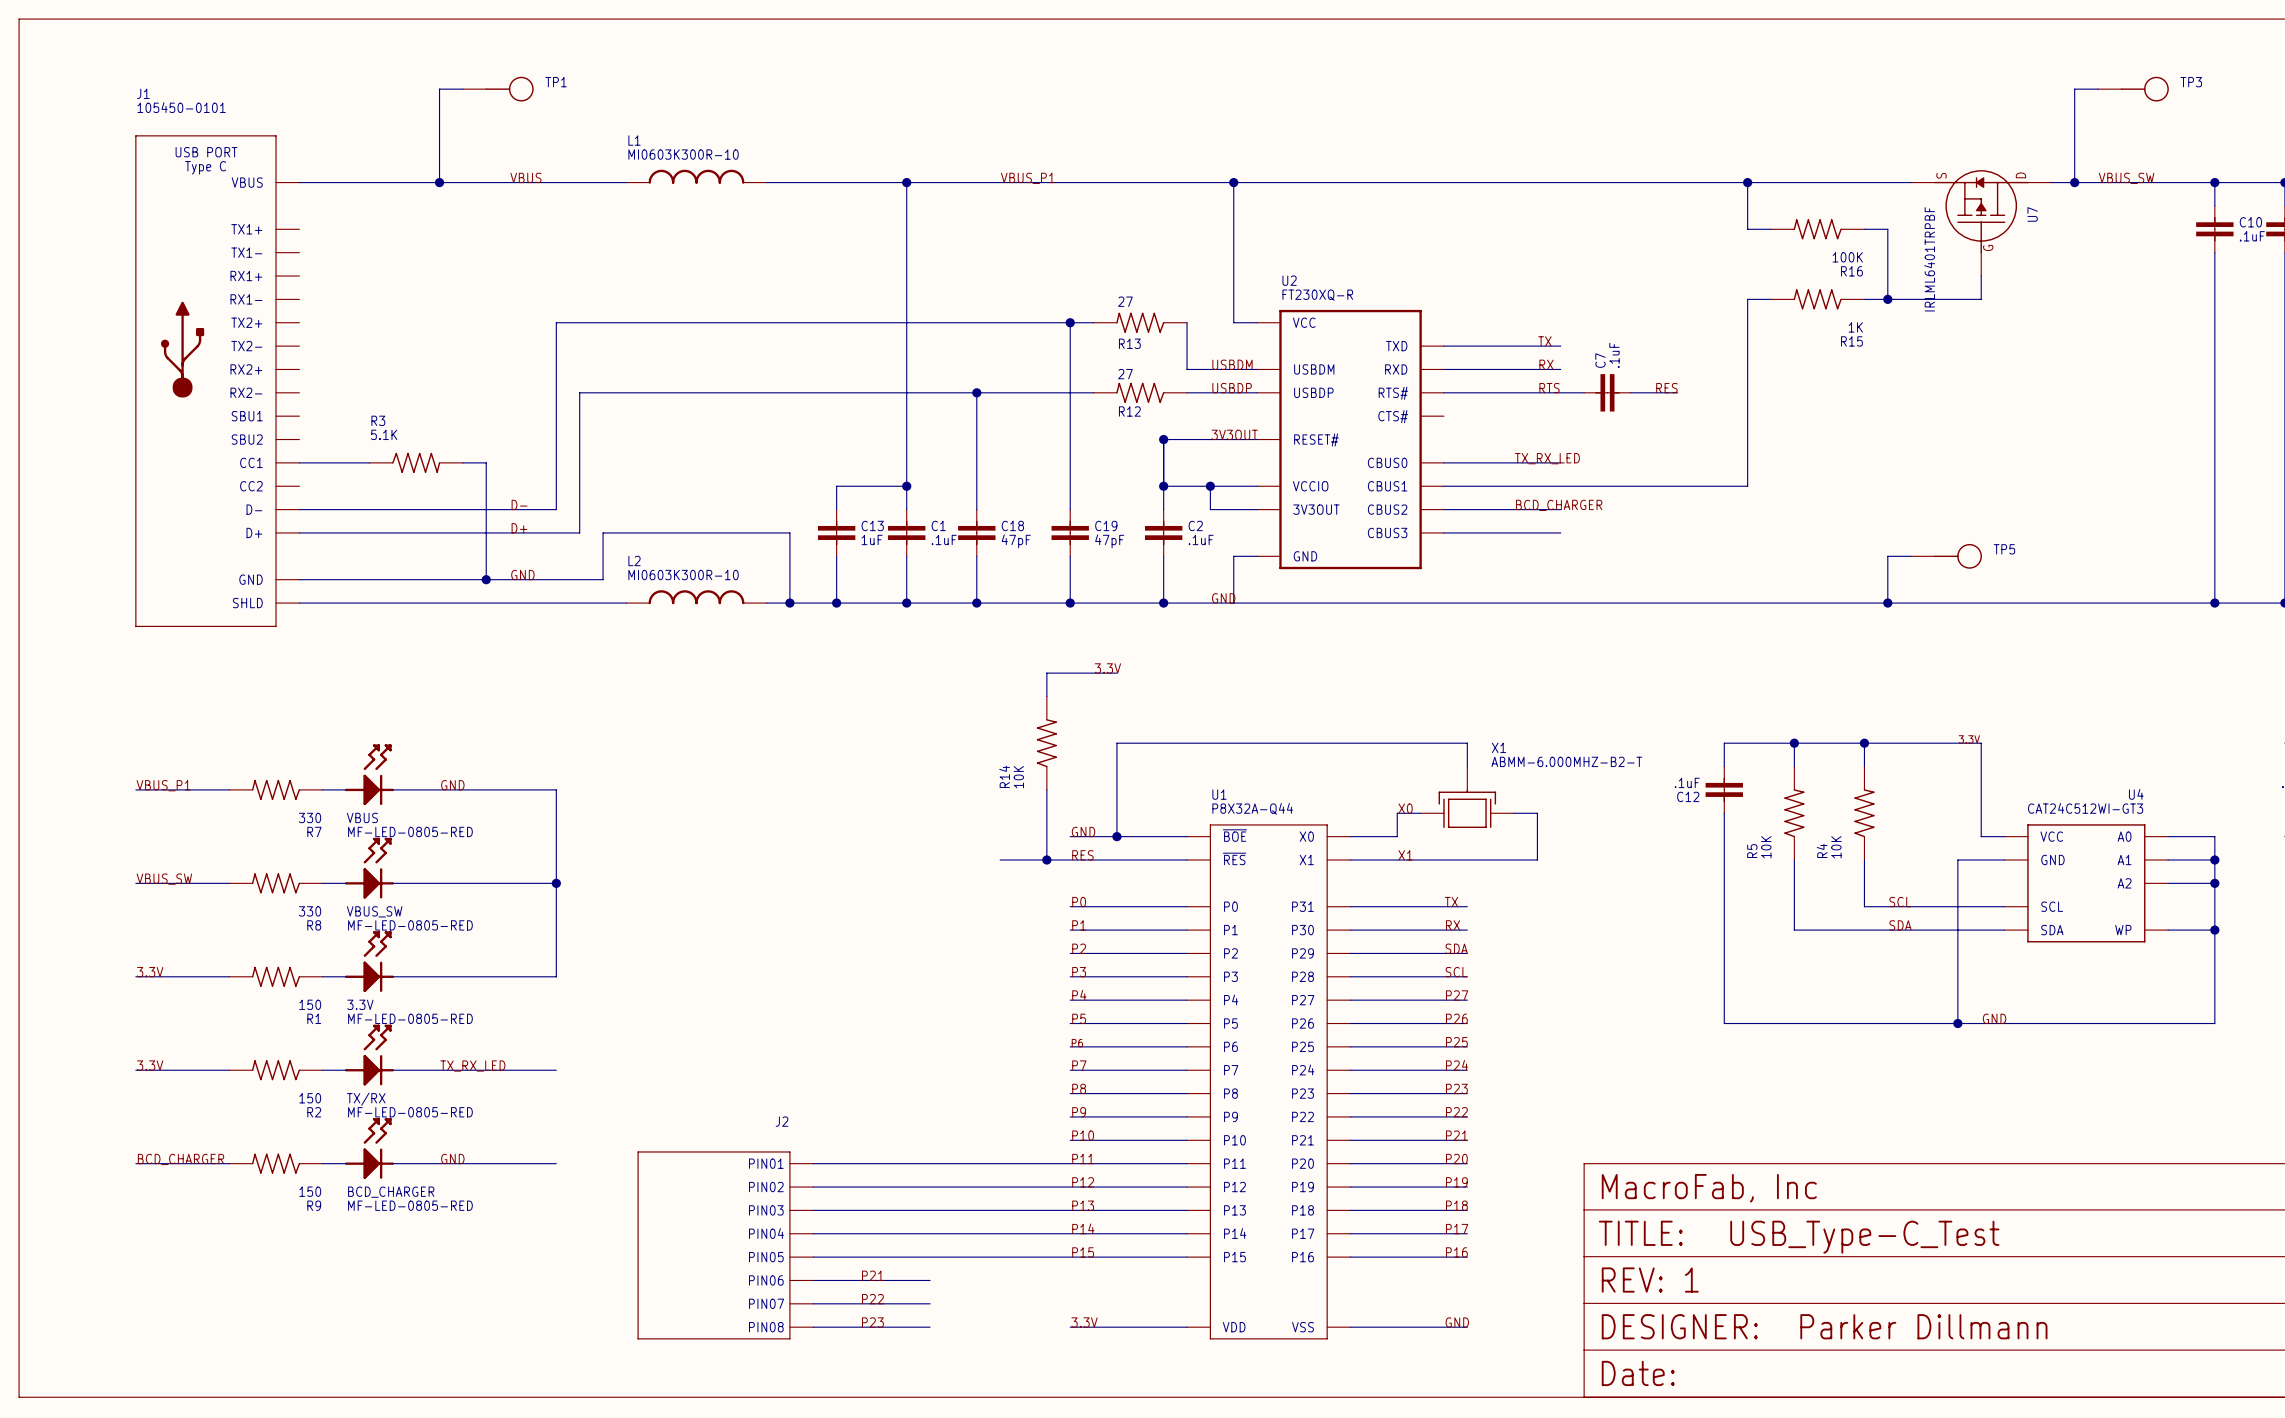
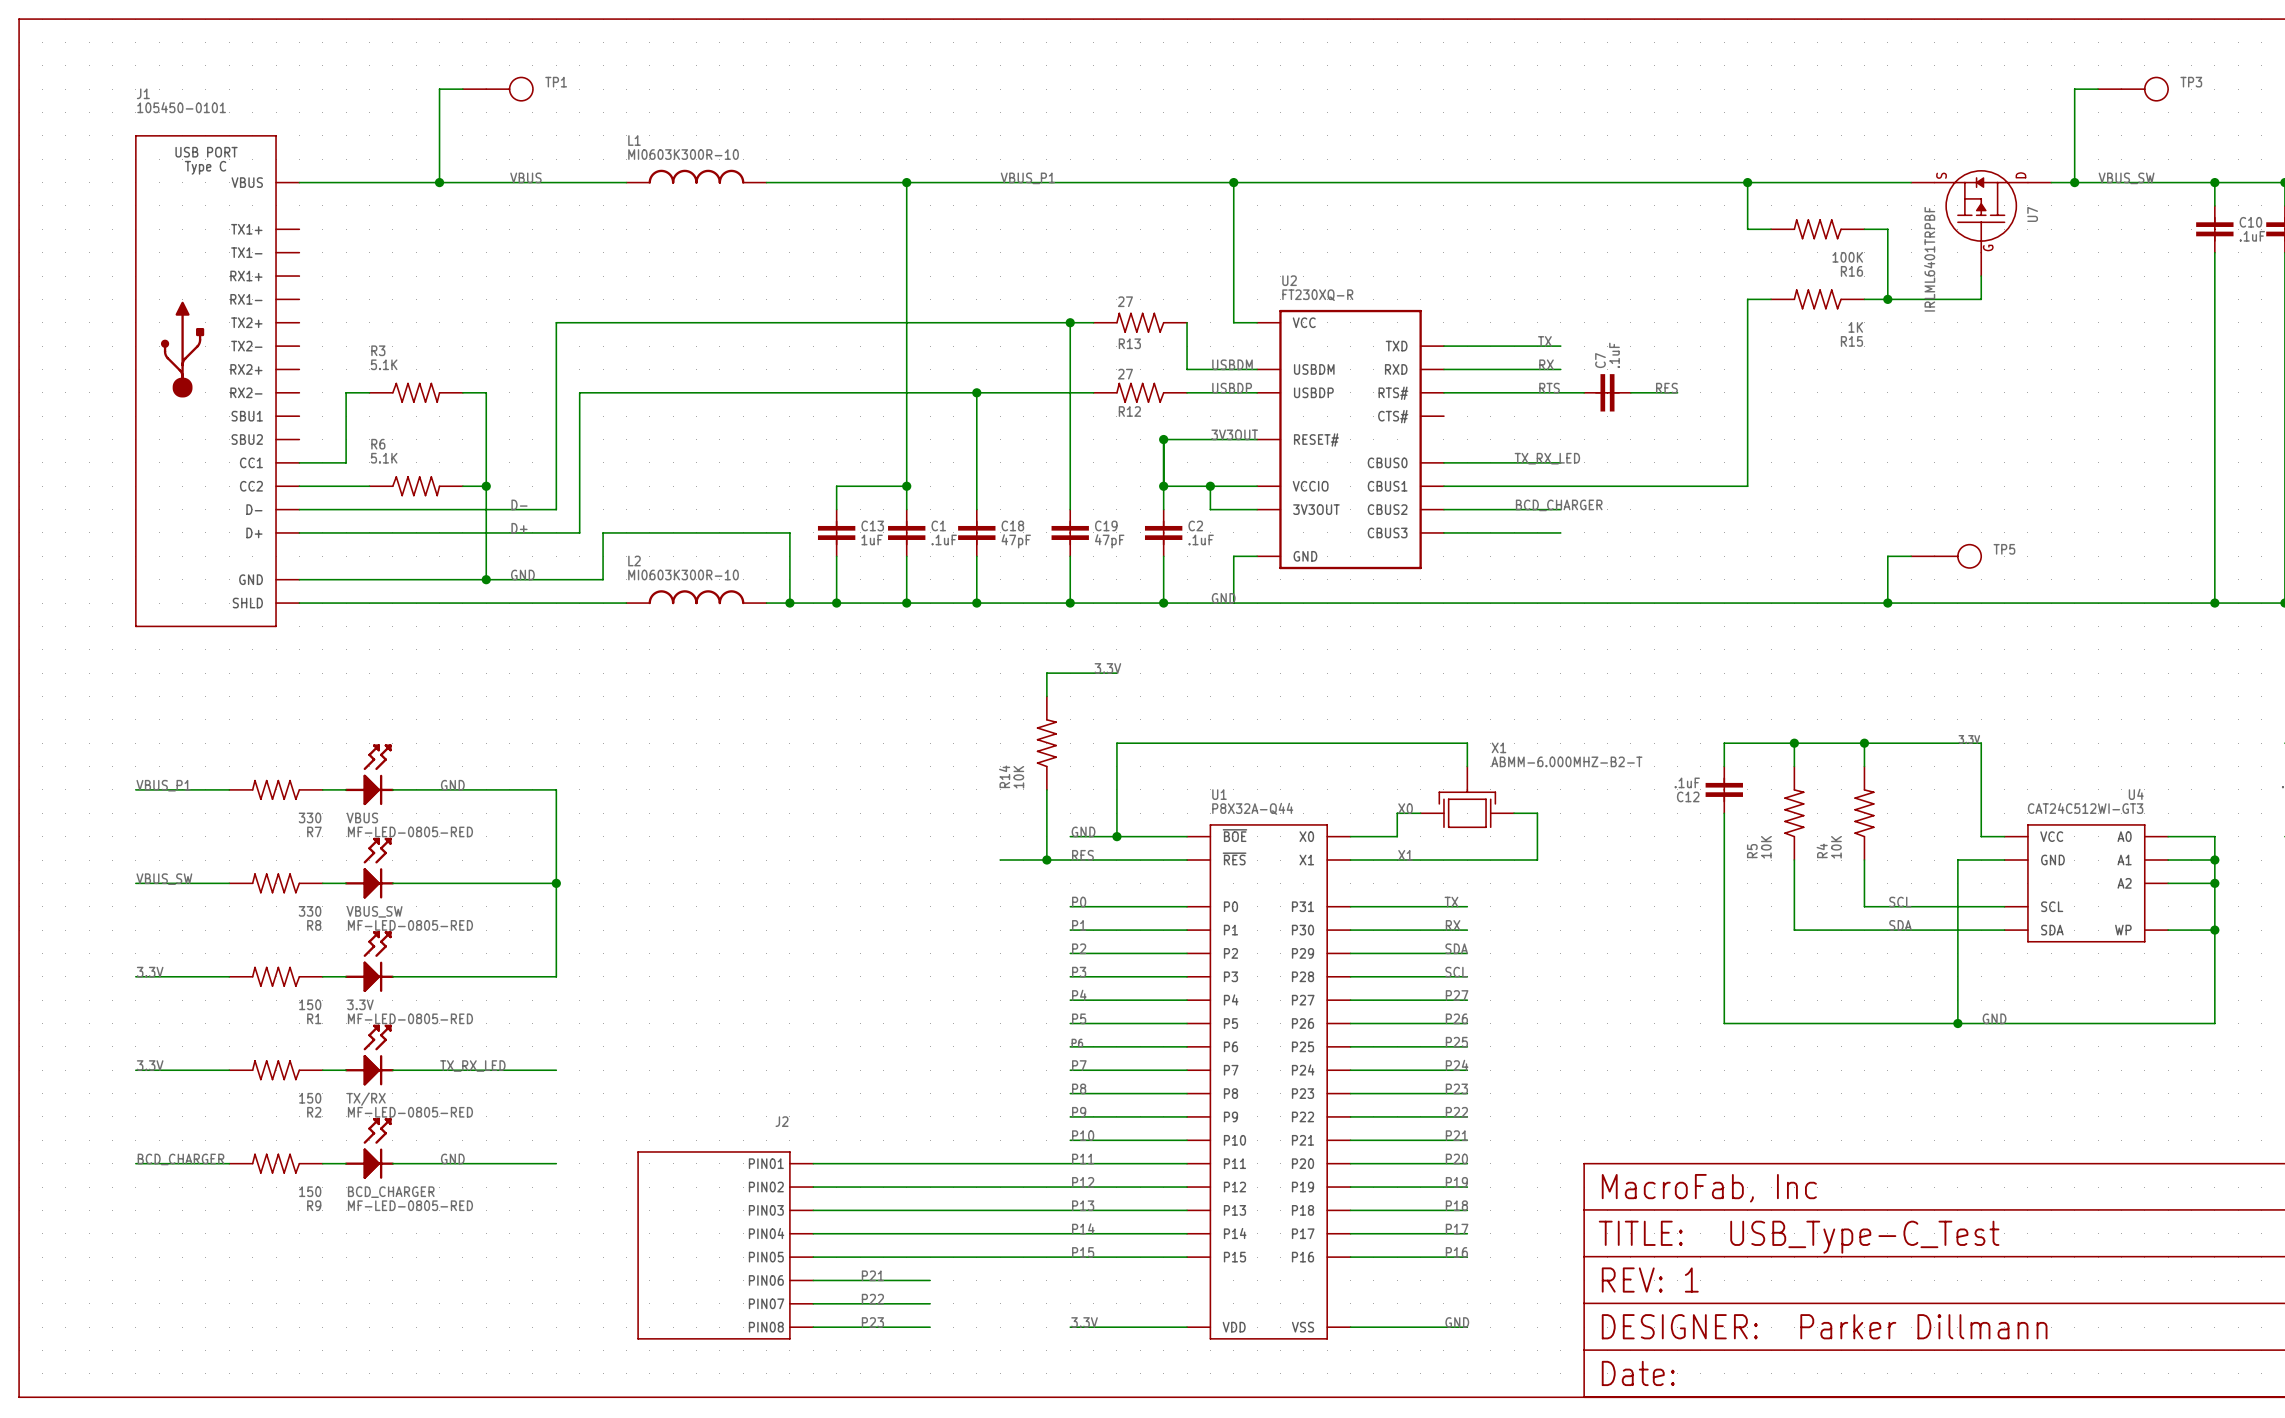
wire: (346, 462) (369, 462) -> (346, 462) (346, 392) (369, 392)
R3 position: (416, 462) -> (416, 392)
wire: (462, 462) (486, 462) -> (462, 392) (486, 392) (486, 462)
wire: none -> (299, 486) (369, 486)
R6: none -> 5.1K (416, 486)
wire: none -> (462, 486) (486, 486)
junction: none -> (486, 486)

